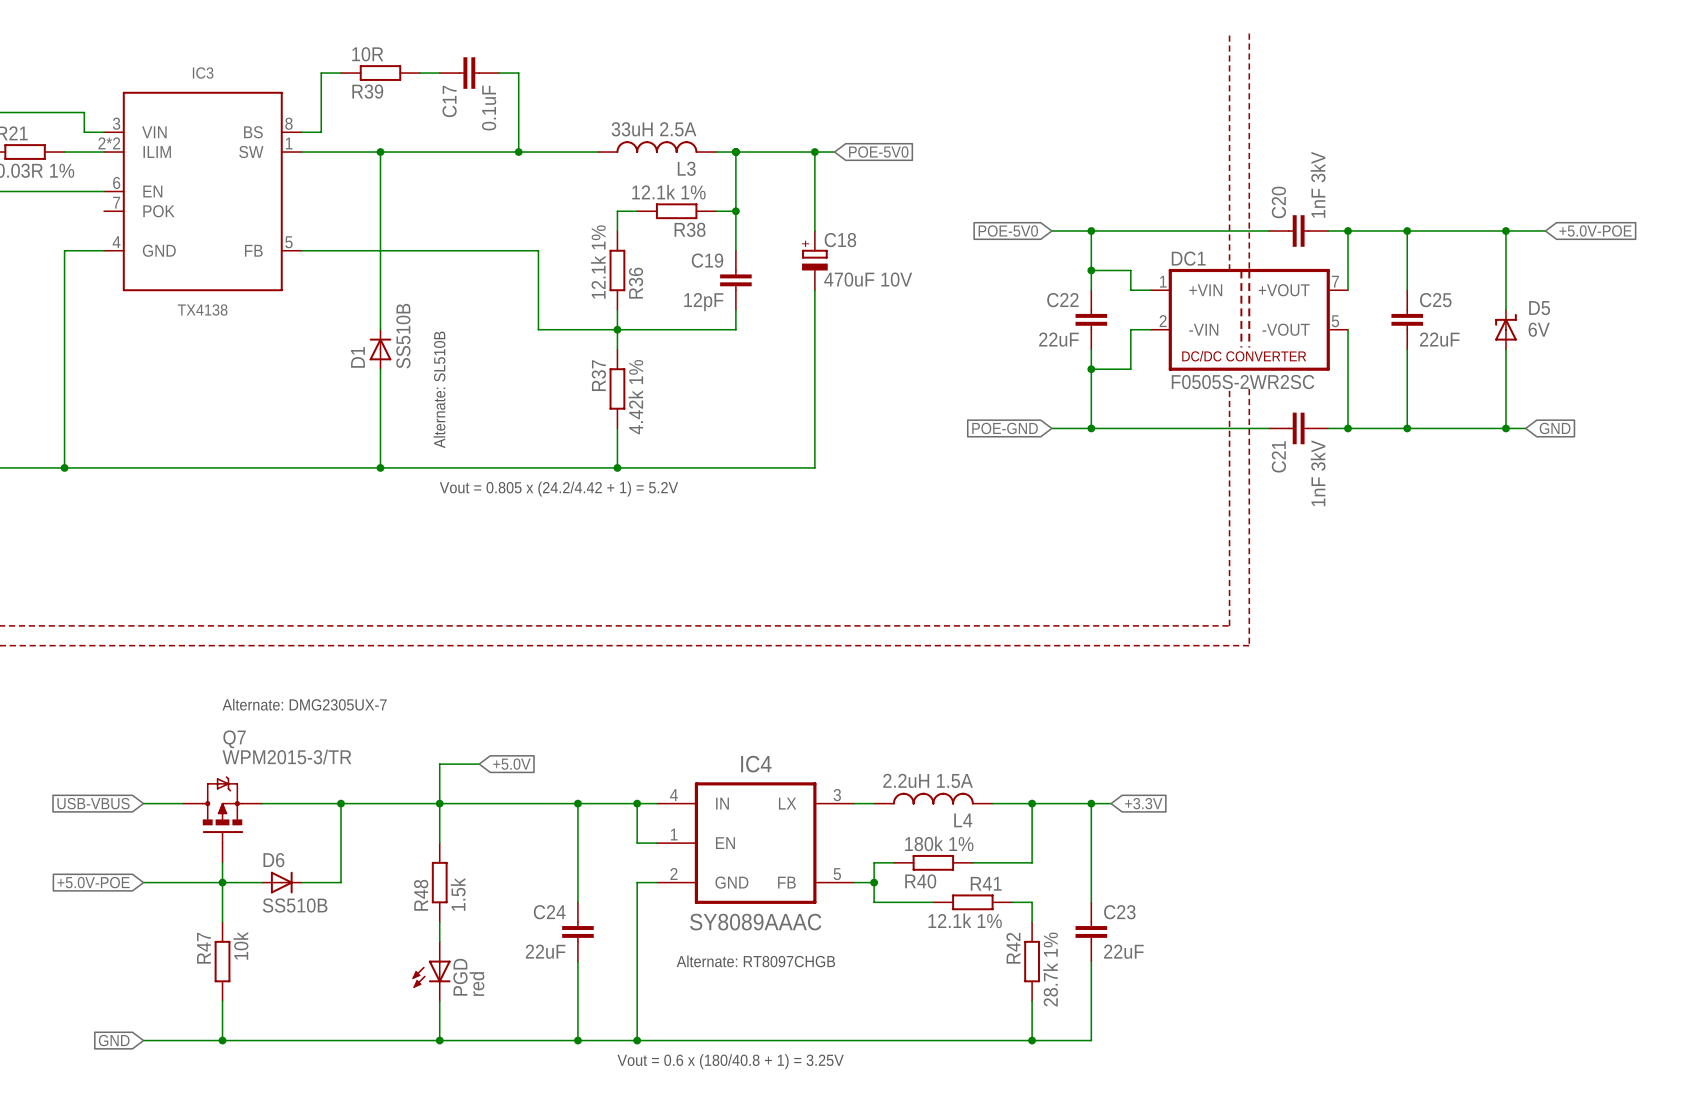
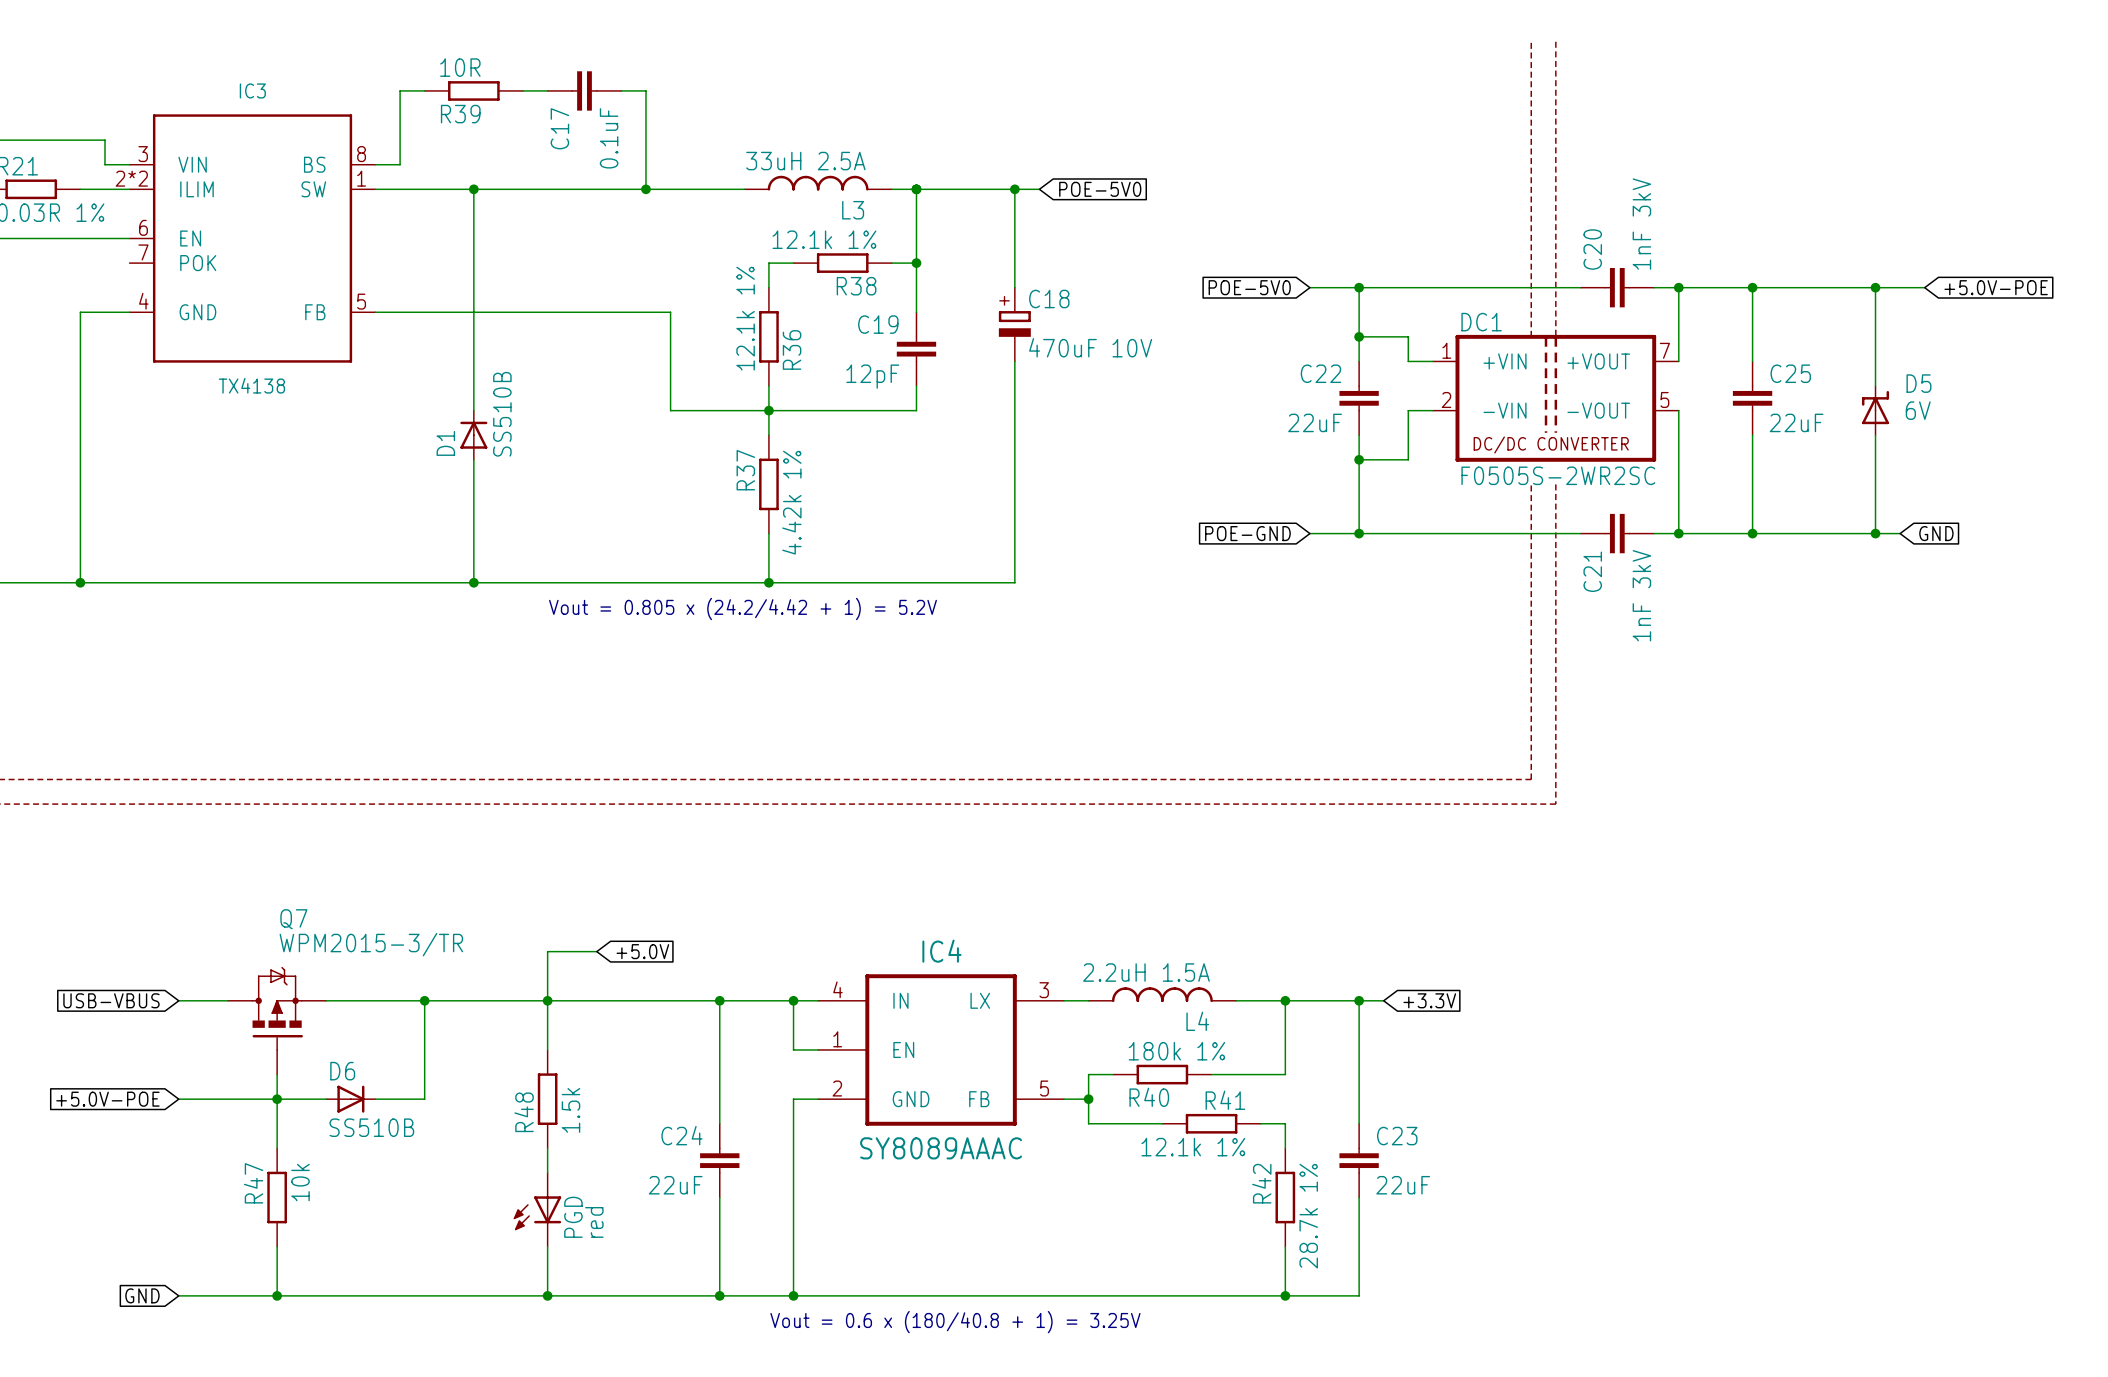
text: Alternate: SL510B (439, 389) -> none
text: Alternate: DMG2305UX-7 (304, 704) -> none
text: Alternate: RT8097CHGB (755, 961) -> none

